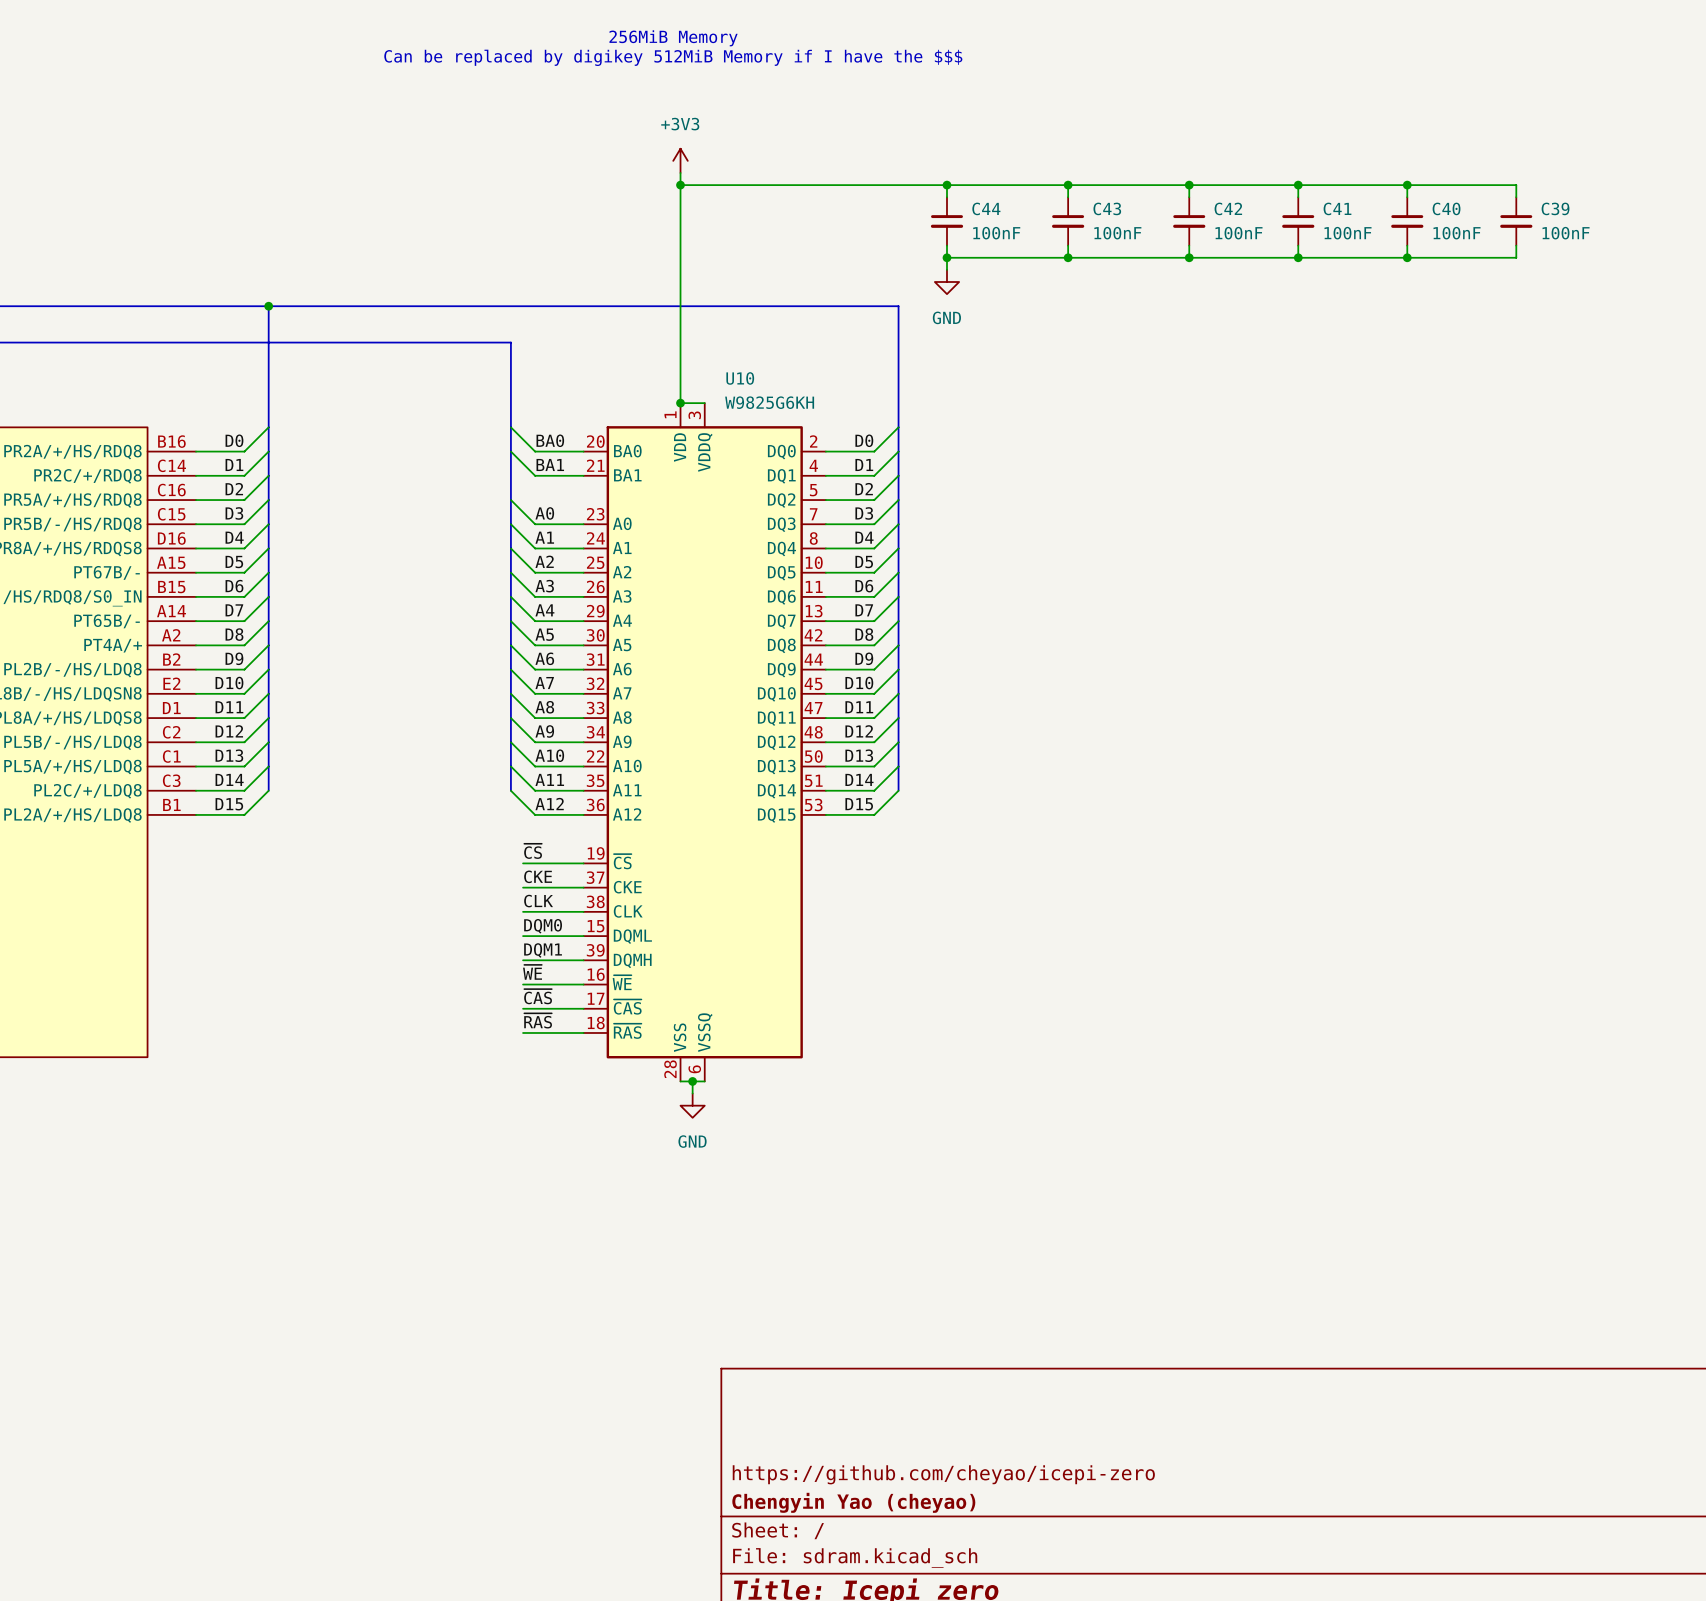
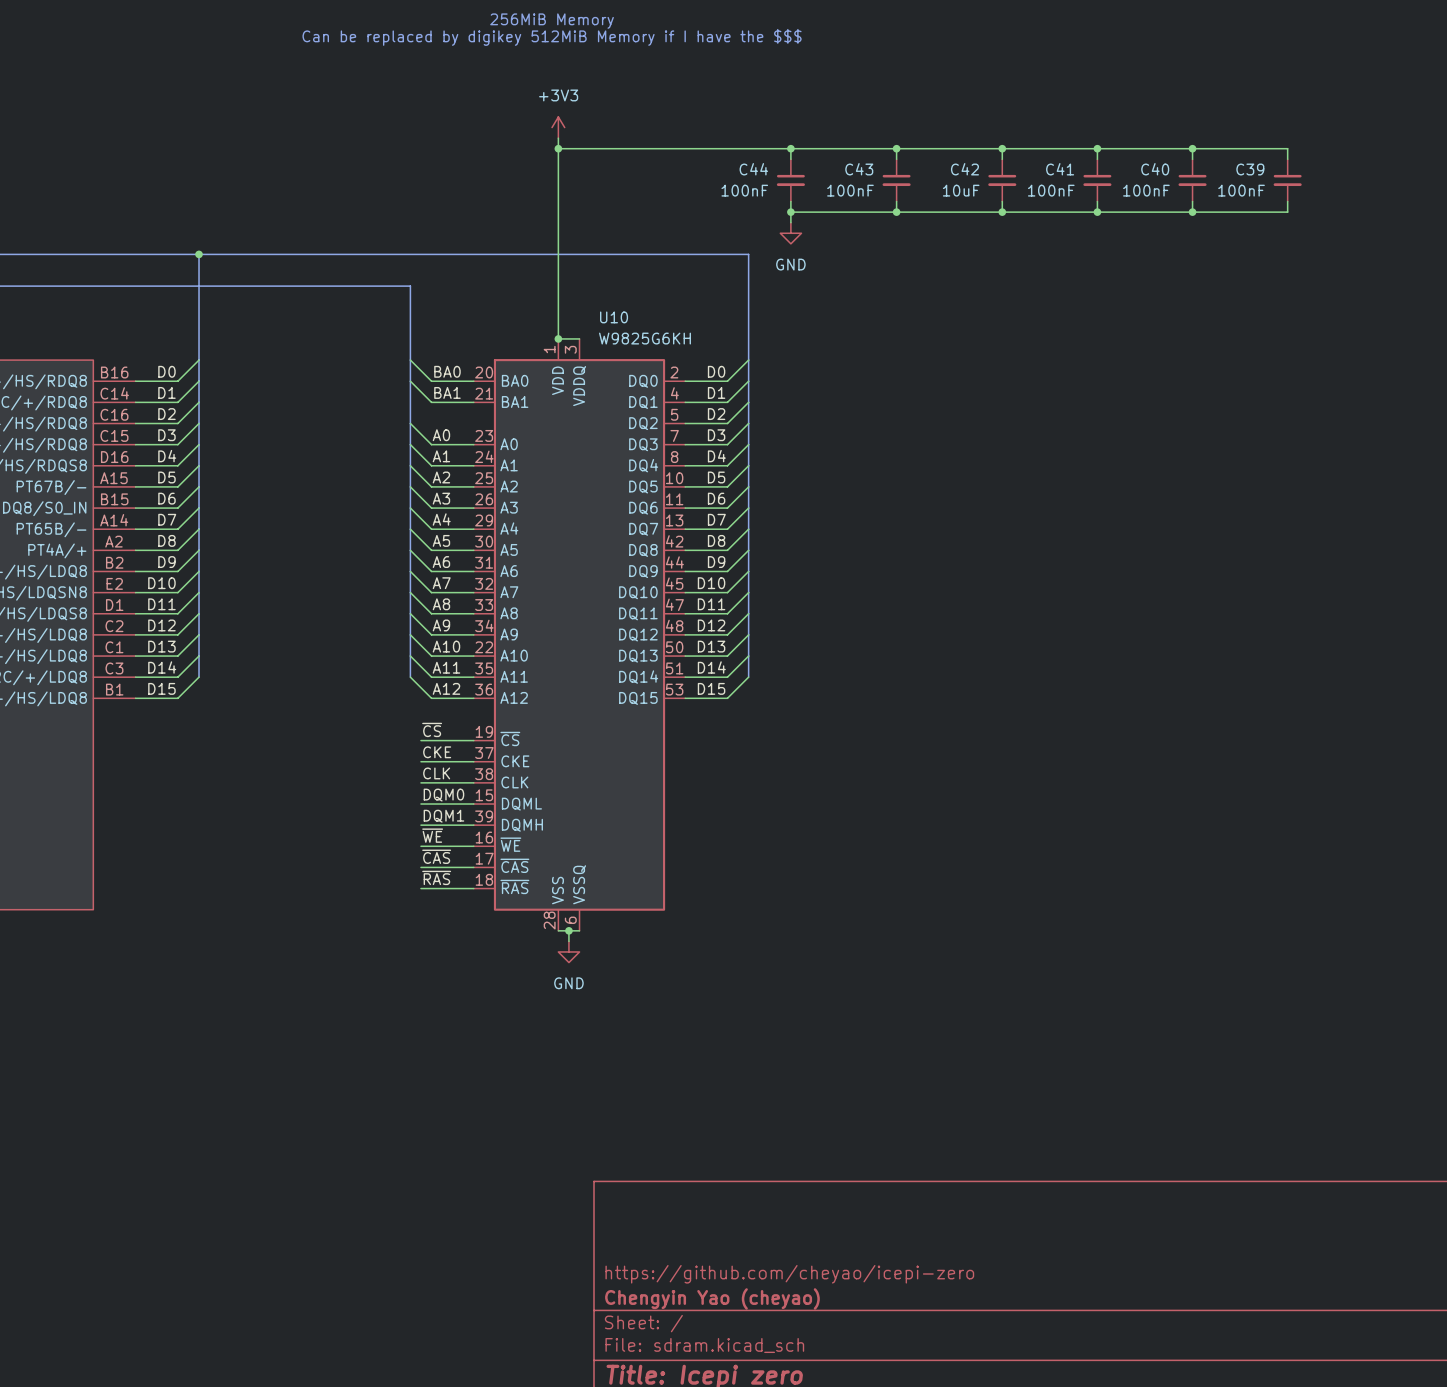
C44 name position: C44 (986, 208) -> C44 (753, 169)
C43 name position: C43 (1107, 208) -> C43 (859, 169)
C42 name position: C42 (1228, 208) -> C42 (964, 169)
C41 name position: C41 (1337, 208) -> C41 (1060, 169)
C40 name position: C40 (1446, 208) -> C40 (1155, 169)
C39 name position: C39 (1555, 208) -> C39 (1250, 169)
C44 value position: 100nF (996, 233) -> 100nF (744, 190)
C43 value position: 100nF (1117, 233) -> 100nF (850, 190)
C42 value: 100nF (1238, 233) -> 10uF (961, 190)
C41 value position: 100nF (1348, 233) -> 100nF (1051, 190)
C40 value position: 100nF (1457, 233) -> 100nF (1146, 190)
C39 value position: 100nF (1566, 233) -> 100nF (1241, 190)

